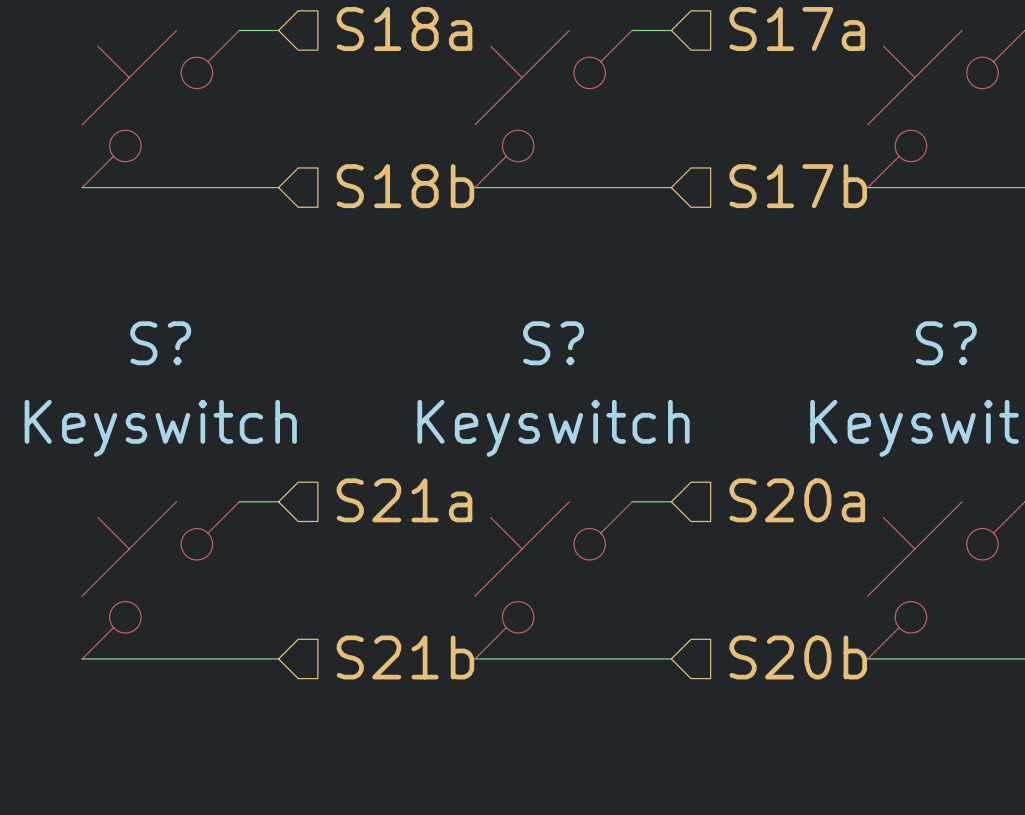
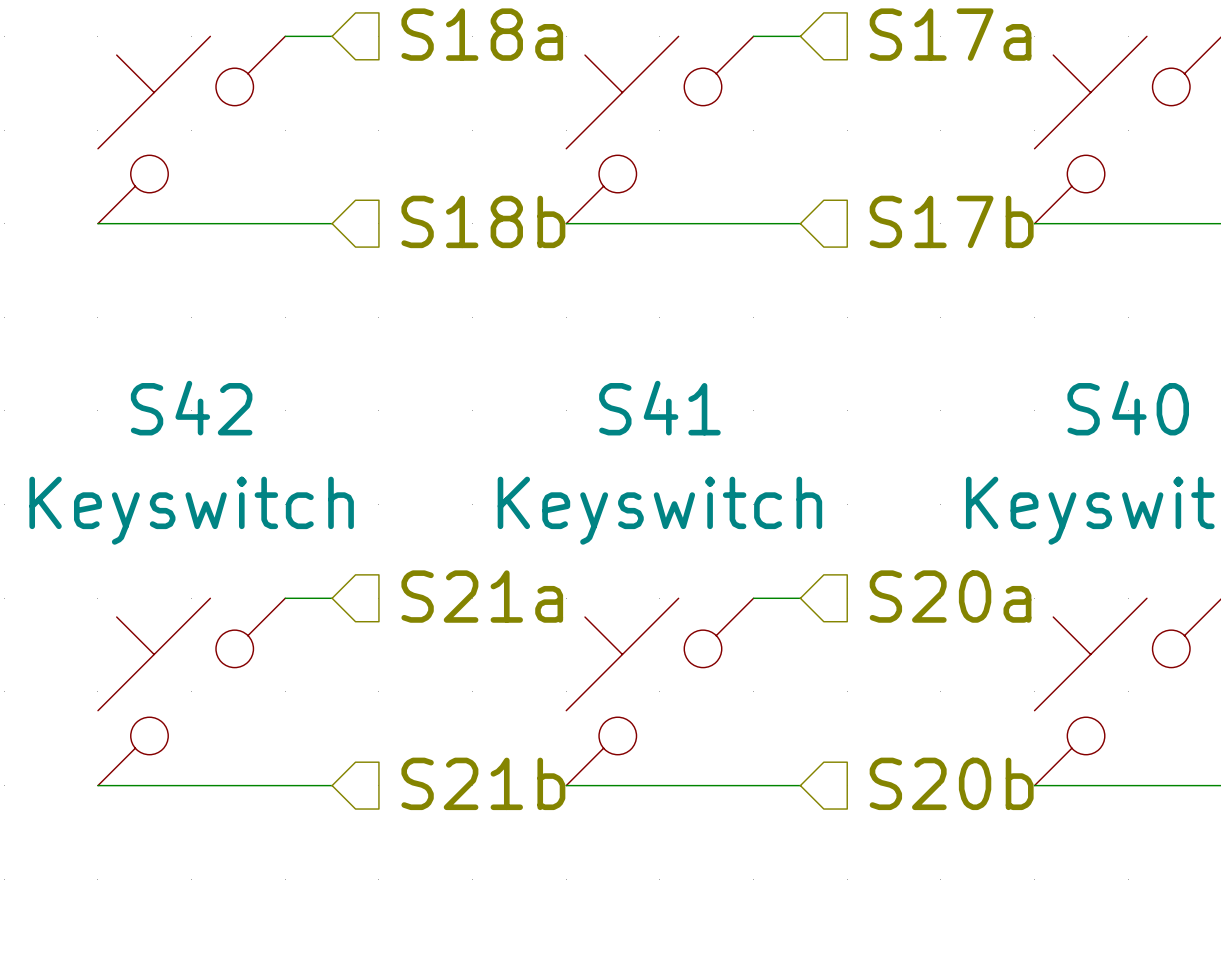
S? name: S? (160, 343) -> S42 (191, 408)
S? name: S? (553, 343) -> S41 (659, 408)
S? name: S? (946, 343) -> S40 (1128, 408)

